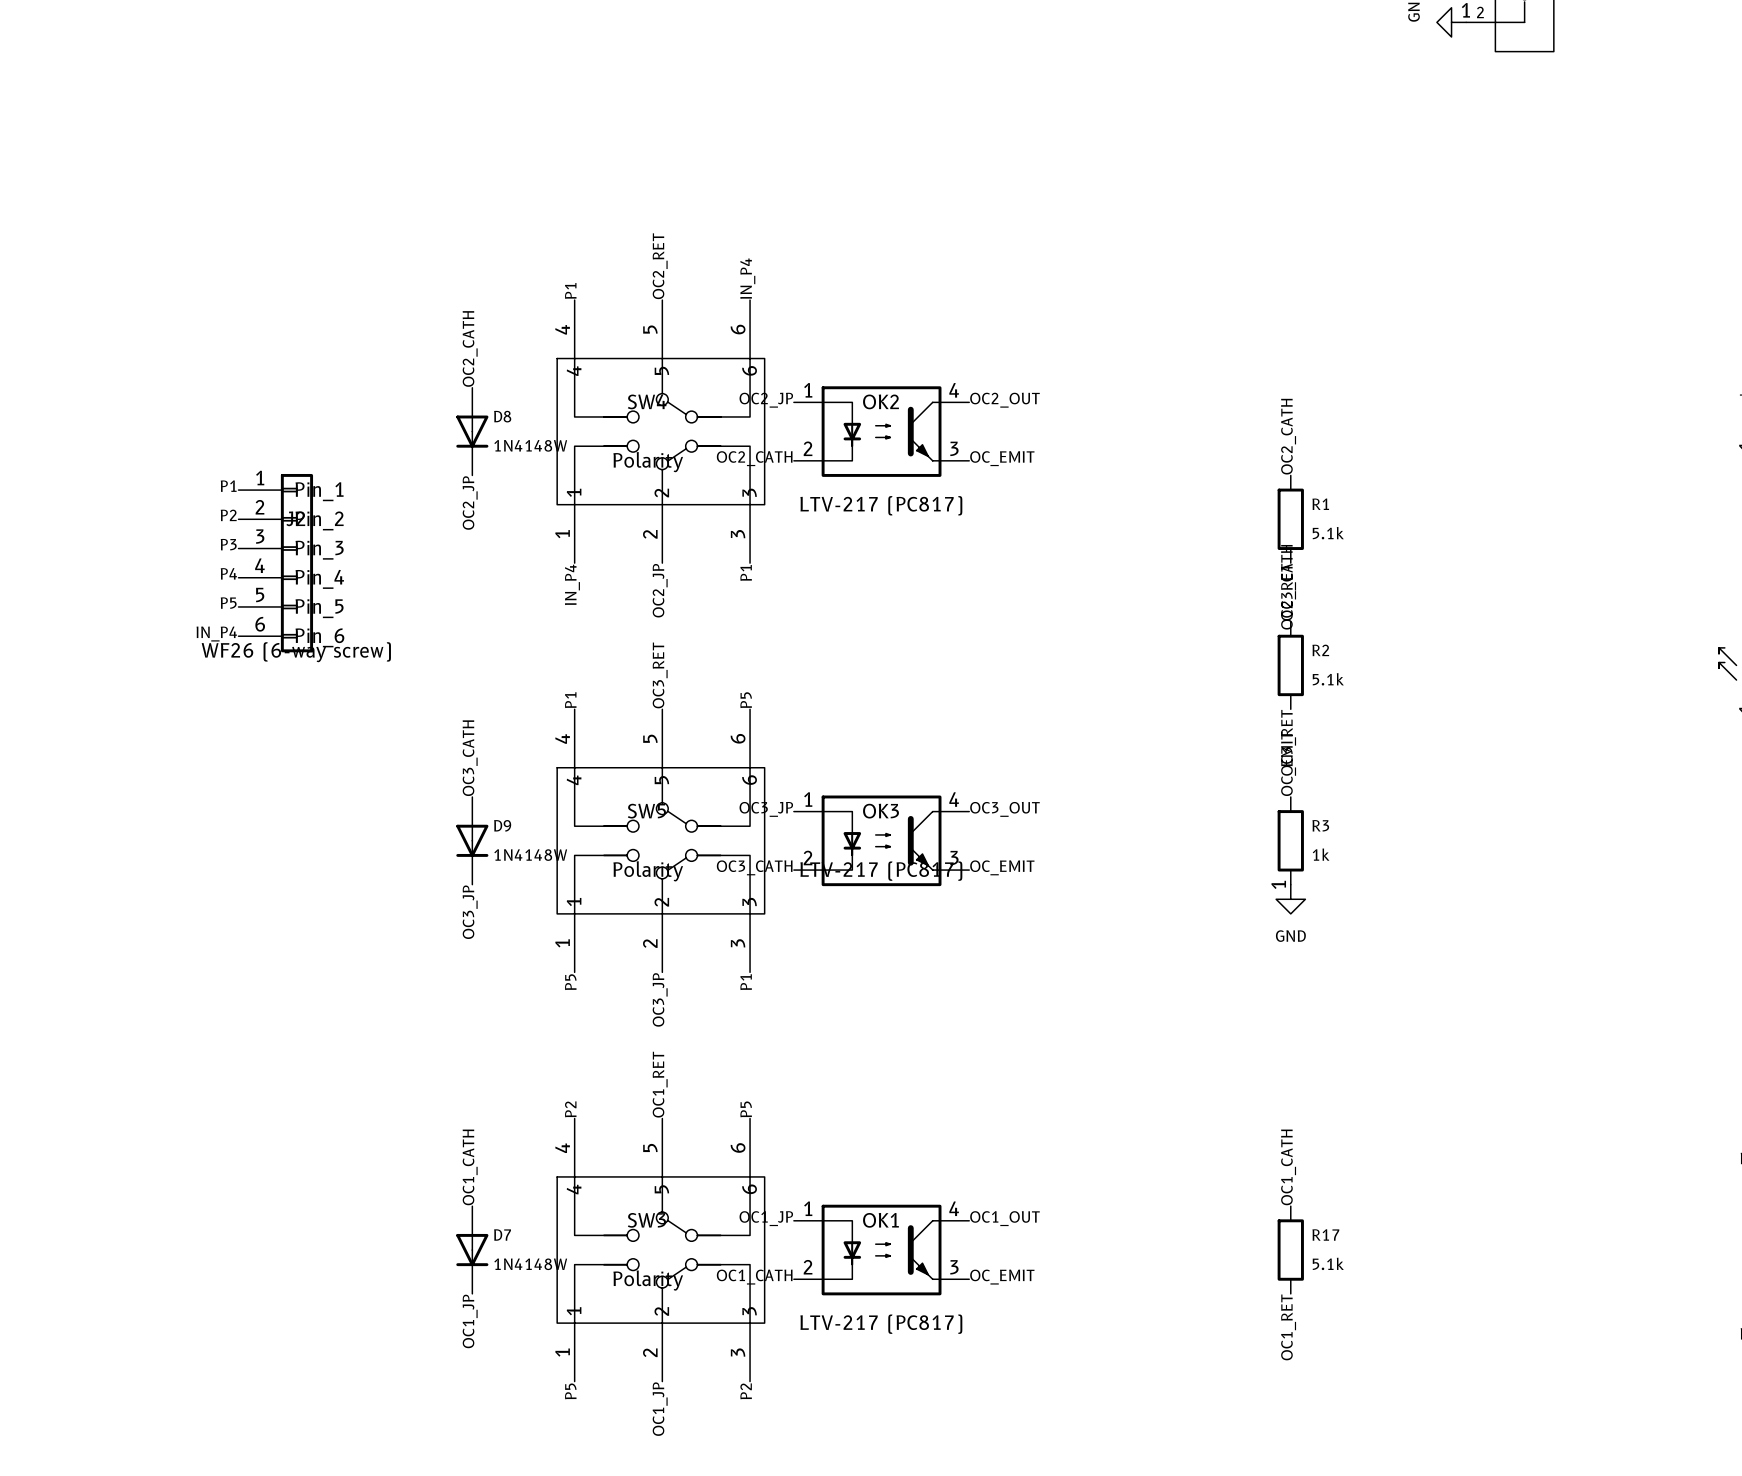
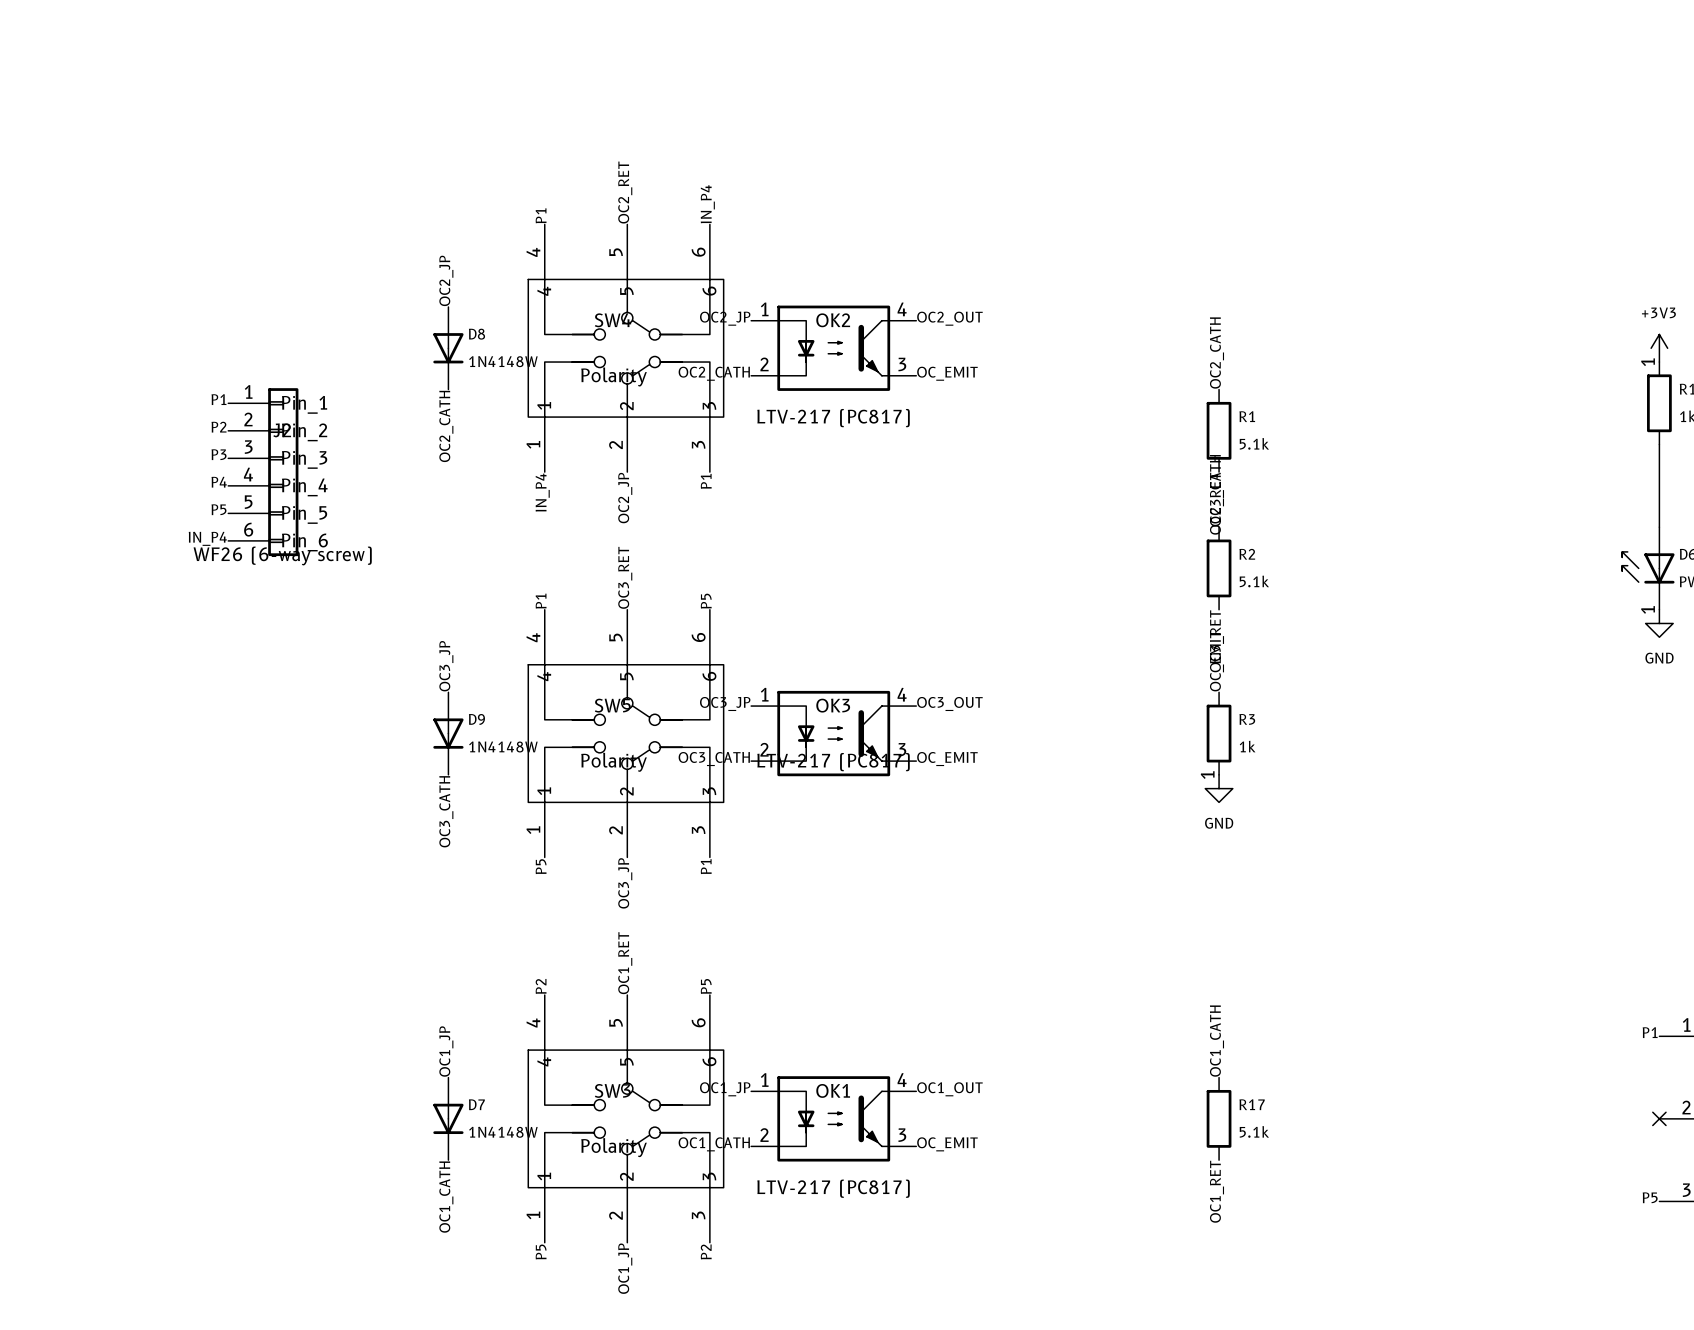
label: OC2_CATH (470, 348) -> OC2_JP (446, 280)
label: OC2_JP (470, 503) -> OC2_CATH (446, 426)
label: OC3_CATH (470, 758) -> OC3_JP (446, 666)
label: OC3_JP (470, 912) -> OC3_CATH (446, 811)
label: OC1_CATH (470, 1167) -> OC1_JP (446, 1051)
label: OC1_JP (470, 1321) -> OC1_CATH (446, 1197)

